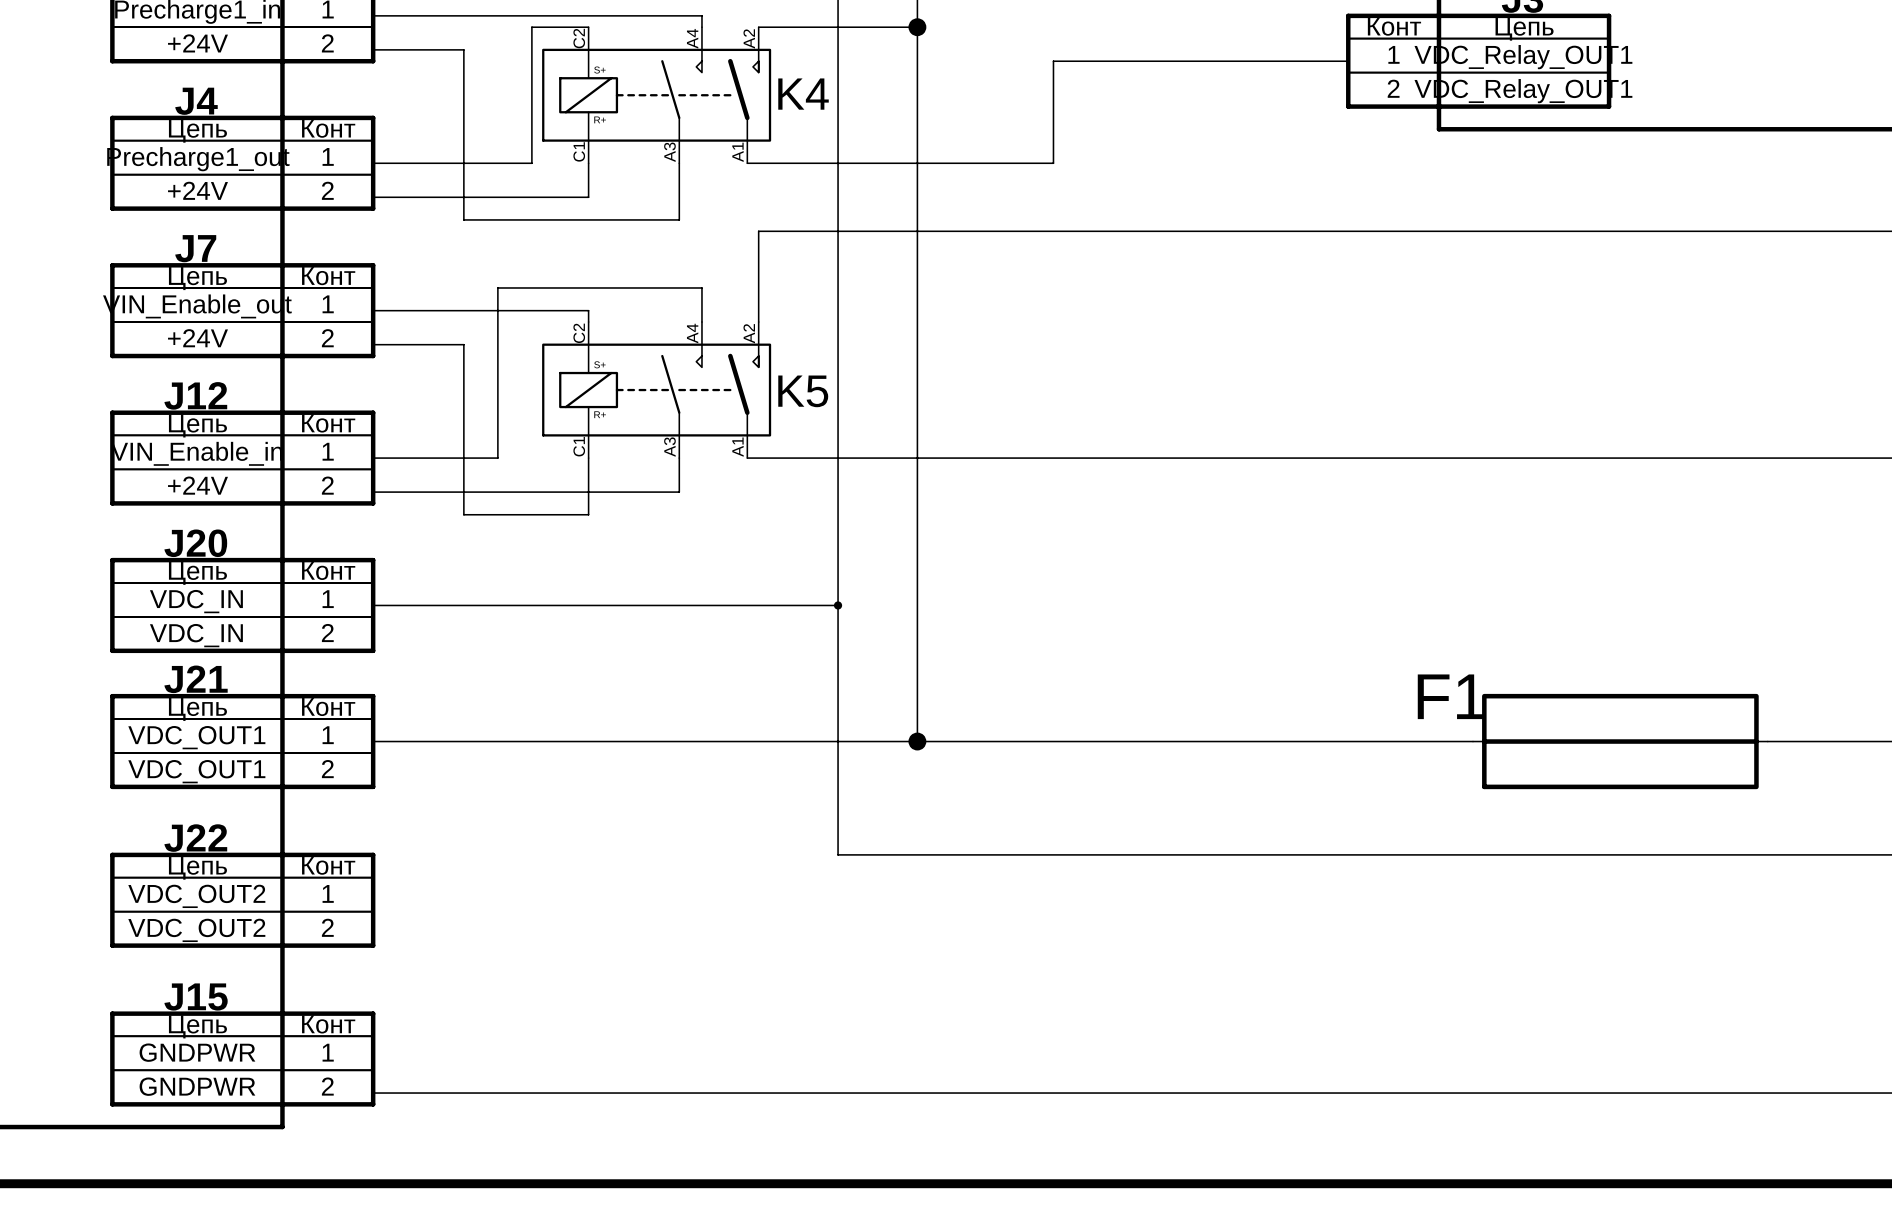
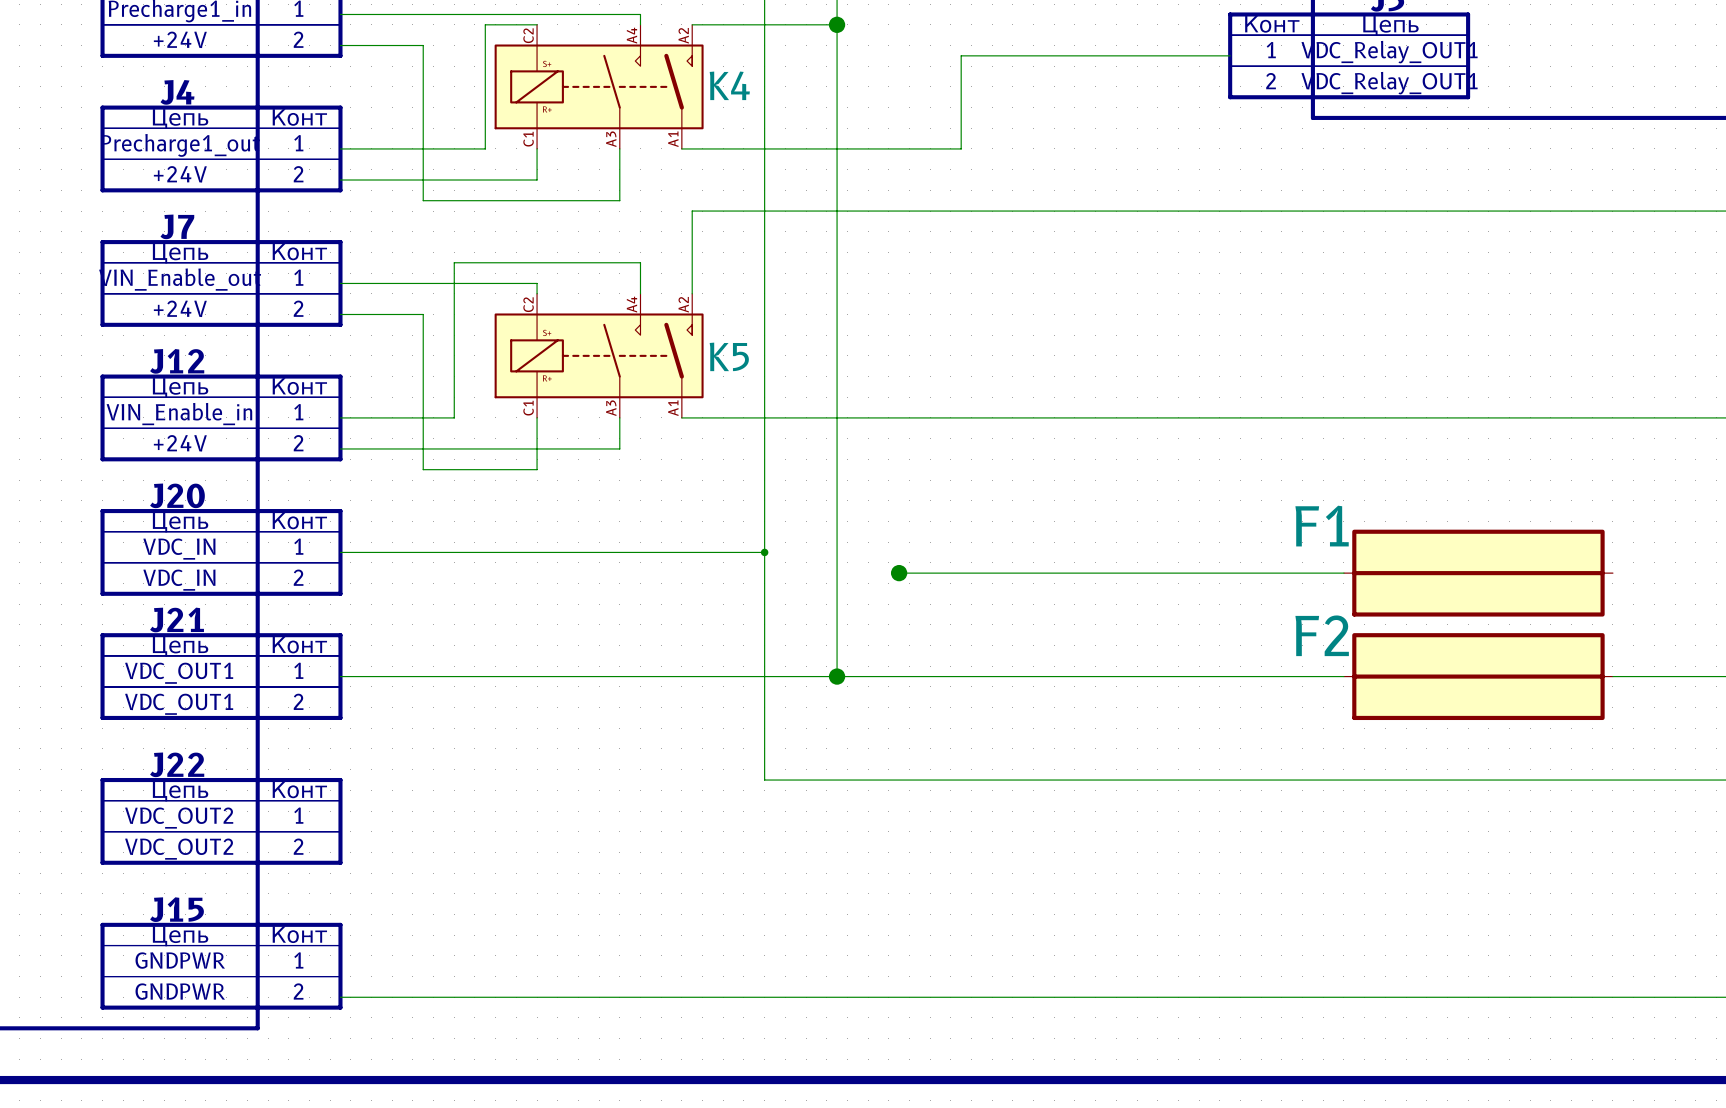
wire: none -> (899, 573) (1343, 573)
junction: none -> (899, 573)
F1: none -> (1478, 573)
F1 name: F1 (1451, 696) -> F2 (1322, 635)

